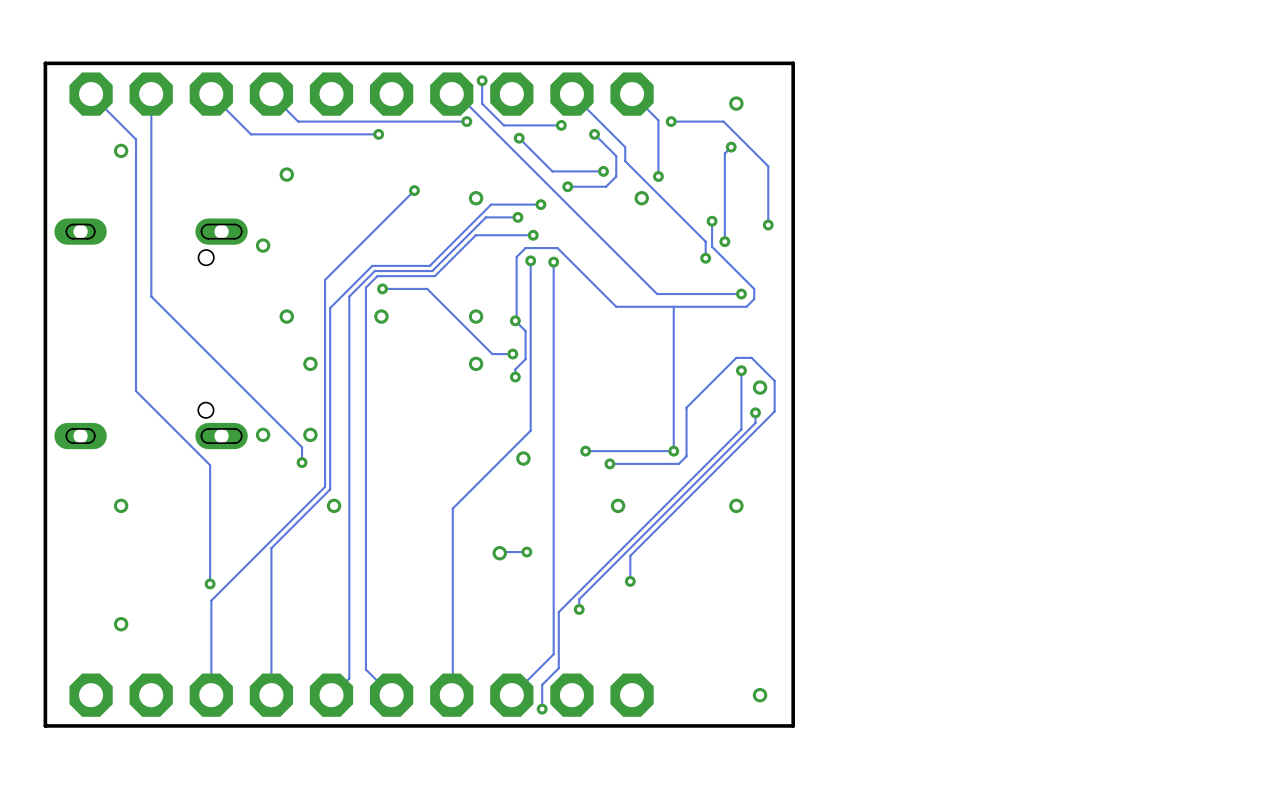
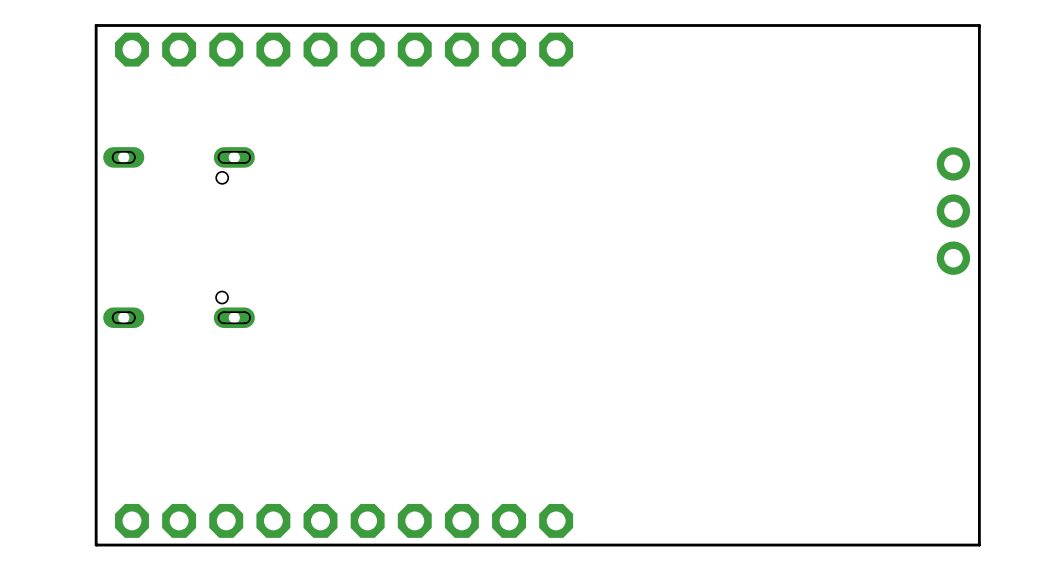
board edge: (793, 63) (793, 725) -> (682, 25) (979, 25) (979, 545) (682, 545)
track: (482, 80) (482, 103) (503, 125) (561, 125) -> none
via: (482, 80) -> none
track: (91, 94) (136, 139) (136, 391) (210, 465) (210, 583) -> none
track: (151, 94) (151, 296) (302, 447) (302, 462) -> none
track: (211, 94) (250, 134) (378, 134) -> none
track: (271, 94) (298, 121) (466, 121) -> none
track: (451, 94) (457, 94) (657, 294) (741, 294) -> none
track: (571, 94) (625, 147) (625, 161) (705, 241) (705, 258) -> none
track: (632, 94) (658, 120) (658, 176) -> none
via: (736, 103) -> none
via: (466, 121) -> none
track: (671, 121) (723, 121) (768, 166) (768, 225) -> none
via: (671, 121) -> none
via: (561, 125) -> none
via: (378, 134) -> none
track: (594, 134) (616, 156) (616, 176) (606, 186) (567, 186) -> none
via: (594, 134) -> none
track: (519, 138) (552, 171) (603, 171) -> none
via: (519, 138) -> none
track: (731, 147) (724, 153) (724, 241) -> none
via: (731, 147) -> none
via: (121, 150) -> none
via: (603, 171) -> none
via: (286, 174) -> none
via: (658, 176) -> none
via: (567, 186) -> none
track: (414, 190) (325, 279) (325, 486) (211, 600) (211, 695) -> none
via: (414, 190) -> none
via: (476, 198) -> none
via: (641, 198) -> none
track: (540, 204) (491, 204) (429, 265) (372, 265) (330, 308) (330, 489) (271, 548) (271, 695) -> none
via: (540, 204) -> none
track: (517, 217) (485, 217) (432, 271) (374, 271) (349, 296) (349, 678) (331, 695) -> none
via: (517, 217) -> none
track: (712, 221) (712, 246) (754, 288) (754, 299) (746, 306) (616, 306) (557, 248) (525, 248) (516, 256) (515, 320) (525, 331) (525, 359) (515, 369) (515, 377) -> none
via: (712, 221) -> none
via: (768, 225) -> none
track: (533, 235) (475, 235) (434, 276) (377, 276) (365, 287) (365, 669) (391, 695) -> none
via: (533, 235) -> none
via: (724, 241) -> none
via: (263, 245) -> none
via: (705, 258) -> none
track: (530, 260) (530, 430) (452, 508) (451, 695) -> none
via: (530, 260) -> none
track: (553, 262) (553, 654) (511, 695) -> none
via: (553, 262) -> none
track: (382, 288) (427, 288) (492, 354) (512, 354) -> none
via: (382, 288) -> none
via: (741, 294) -> none
part: none -> (953, 211)
track: (673, 306) (673, 451) (585, 451) -> none
via: (286, 316) -> none
via: (381, 316) -> none
via: (476, 316) -> none
via: (515, 320) -> none
via: (512, 354) -> none
via: (310, 363) -> none
via: (476, 363) -> none
track: (741, 370) (741, 429) (558, 612) (558, 668) (542, 684) (542, 709) -> none
via: (741, 370) -> none
via: (515, 377) -> none
via: (760, 387) -> none
track: (755, 412) (755, 423) (579, 599) (579, 609) -> none
via: (755, 412) -> none
via: (263, 434) -> none
via: (310, 434) -> none
via: (585, 451) -> none
via: (673, 451) -> none
via: (523, 458) -> none
via: (302, 462) -> none
track: (609, 463) (678, 463) (686, 456) (686, 407) (736, 357) (751, 357) (774, 380) (774, 411) (630, 555) (630, 581) -> none
via: (609, 463) -> none
via: (121, 505) -> none
via: (334, 505) -> none
via: (618, 505) -> none
via: (736, 505) -> none
track: (526, 552) (499, 553) -> none
via: (526, 552) -> none
via: (499, 553) -> none
via: (630, 581) -> none
via: (210, 583) -> none
via: (579, 609) -> none
via: (121, 624) -> none
via: (760, 695) -> none
via: (542, 709) -> none

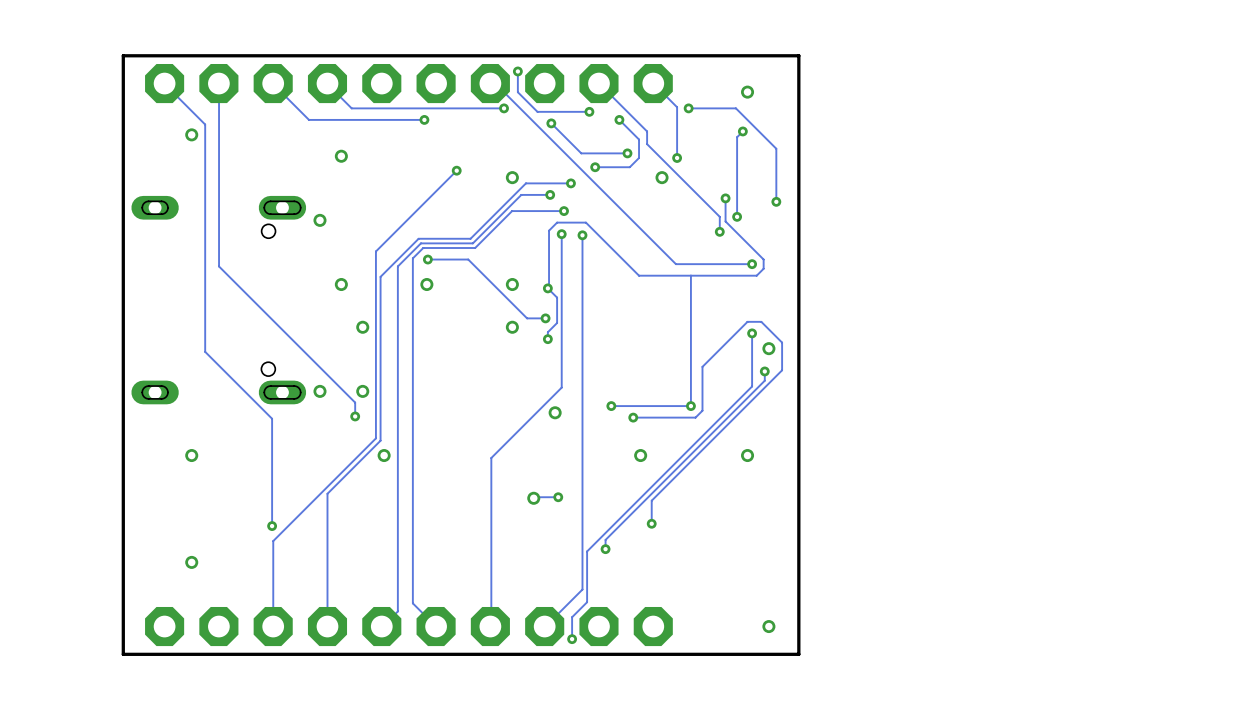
board edge: (682, 25) (979, 25) (979, 545) (682, 545) -> (798, 55) (798, 654)
track: none -> (517, 71) (517, 92) (537, 111) (589, 111)
via: none -> (517, 71)
track: none -> (164, 83) (205, 124) (205, 351) (272, 418) (272, 526)
track: none -> (218, 83) (219, 266) (355, 402) (355, 416)
track: none -> (273, 83) (309, 119) (424, 119)
track: none -> (327, 83) (351, 108) (504, 108)
track: none -> (490, 83) (495, 84) (675, 264) (752, 264)
track: none -> (598, 83) (647, 131) (647, 144) (719, 216) (719, 231)
track: none -> (653, 83) (677, 107) (677, 158)
via: none -> (747, 92)
via: none -> (504, 108)
track: none -> (688, 108) (735, 108) (776, 148) (776, 201)
via: none -> (688, 108)
via: none -> (589, 111)
via: none -> (424, 119)
track: none -> (619, 119) (639, 139) (639, 158) (629, 167) (595, 167)
via: none -> (619, 119)
track: none -> (551, 123) (581, 153) (627, 153)
via: none -> (551, 123)
track: none -> (742, 131) (737, 137) (737, 216)
via: none -> (742, 131)
via: none -> (191, 134)
via: none -> (627, 153)
via: none -> (341, 156)
via: none -> (677, 158)
via: none -> (595, 167)
track: none -> (456, 170) (375, 251) (375, 438) (273, 541) (273, 626)
via: none -> (456, 170)
via: none -> (512, 177)
via: none -> (662, 177)
track: none -> (570, 183) (525, 183) (470, 238) (418, 238) (380, 276) (380, 440) (327, 493) (327, 626)
via: none -> (570, 183)
track: none -> (550, 194) (521, 194) (472, 243) (420, 243) (397, 266) (397, 611) (381, 626)
via: none -> (550, 194)
track: none -> (725, 198) (725, 221) (763, 259) (763, 268) (756, 275) (639, 275) (585, 222) (557, 222) (549, 230) (547, 288) (557, 297) (557, 323) (547, 332) (547, 339)
via: none -> (725, 198)
via: none -> (776, 201)
track: none -> (564, 211) (512, 211) (475, 248) (423, 248) (412, 258) (412, 603) (435, 626)
via: none -> (564, 211)
via: none -> (737, 216)
via: none -> (319, 220)
via: none -> (719, 231)
track: none -> (561, 234) (561, 387) (491, 457) (490, 626)
via: none -> (561, 234)
track: none -> (582, 235) (582, 589) (544, 626)
via: none -> (582, 235)
track: none -> (427, 259) (468, 259) (527, 318) (545, 318)
via: none -> (427, 259)
via: none -> (752, 264)
part: (953, 211) -> none
track: none -> (690, 275) (690, 406) (611, 406)
via: none -> (341, 284)
via: none -> (426, 284)
via: none -> (512, 284)
via: none -> (547, 288)
via: none -> (545, 318)
via: none -> (362, 327)
via: none -> (512, 327)
track: none -> (752, 333) (752, 386) (587, 551) (587, 602) (572, 617) (572, 639)
via: none -> (752, 333)
via: none -> (547, 339)
via: none -> (768, 348)
track: none -> (764, 371) (764, 380) (605, 539) (605, 549)
via: none -> (764, 371)
via: none -> (319, 391)
via: none -> (362, 391)
via: none -> (611, 406)
via: none -> (690, 406)
via: none -> (555, 412)
via: none -> (355, 416)
track: none -> (633, 417) (695, 417) (702, 410) (702, 366) (747, 321) (761, 321) (782, 342) (782, 370) (651, 500) (651, 523)
via: none -> (633, 417)
via: none -> (191, 455)
via: none -> (384, 455)
via: none -> (640, 455)
via: none -> (747, 455)
track: none -> (558, 497) (533, 498)
via: none -> (558, 497)
via: none -> (533, 498)
via: none -> (651, 523)
via: none -> (272, 526)
via: none -> (605, 549)
via: none -> (191, 562)
via: none -> (768, 626)
via: none -> (572, 639)

